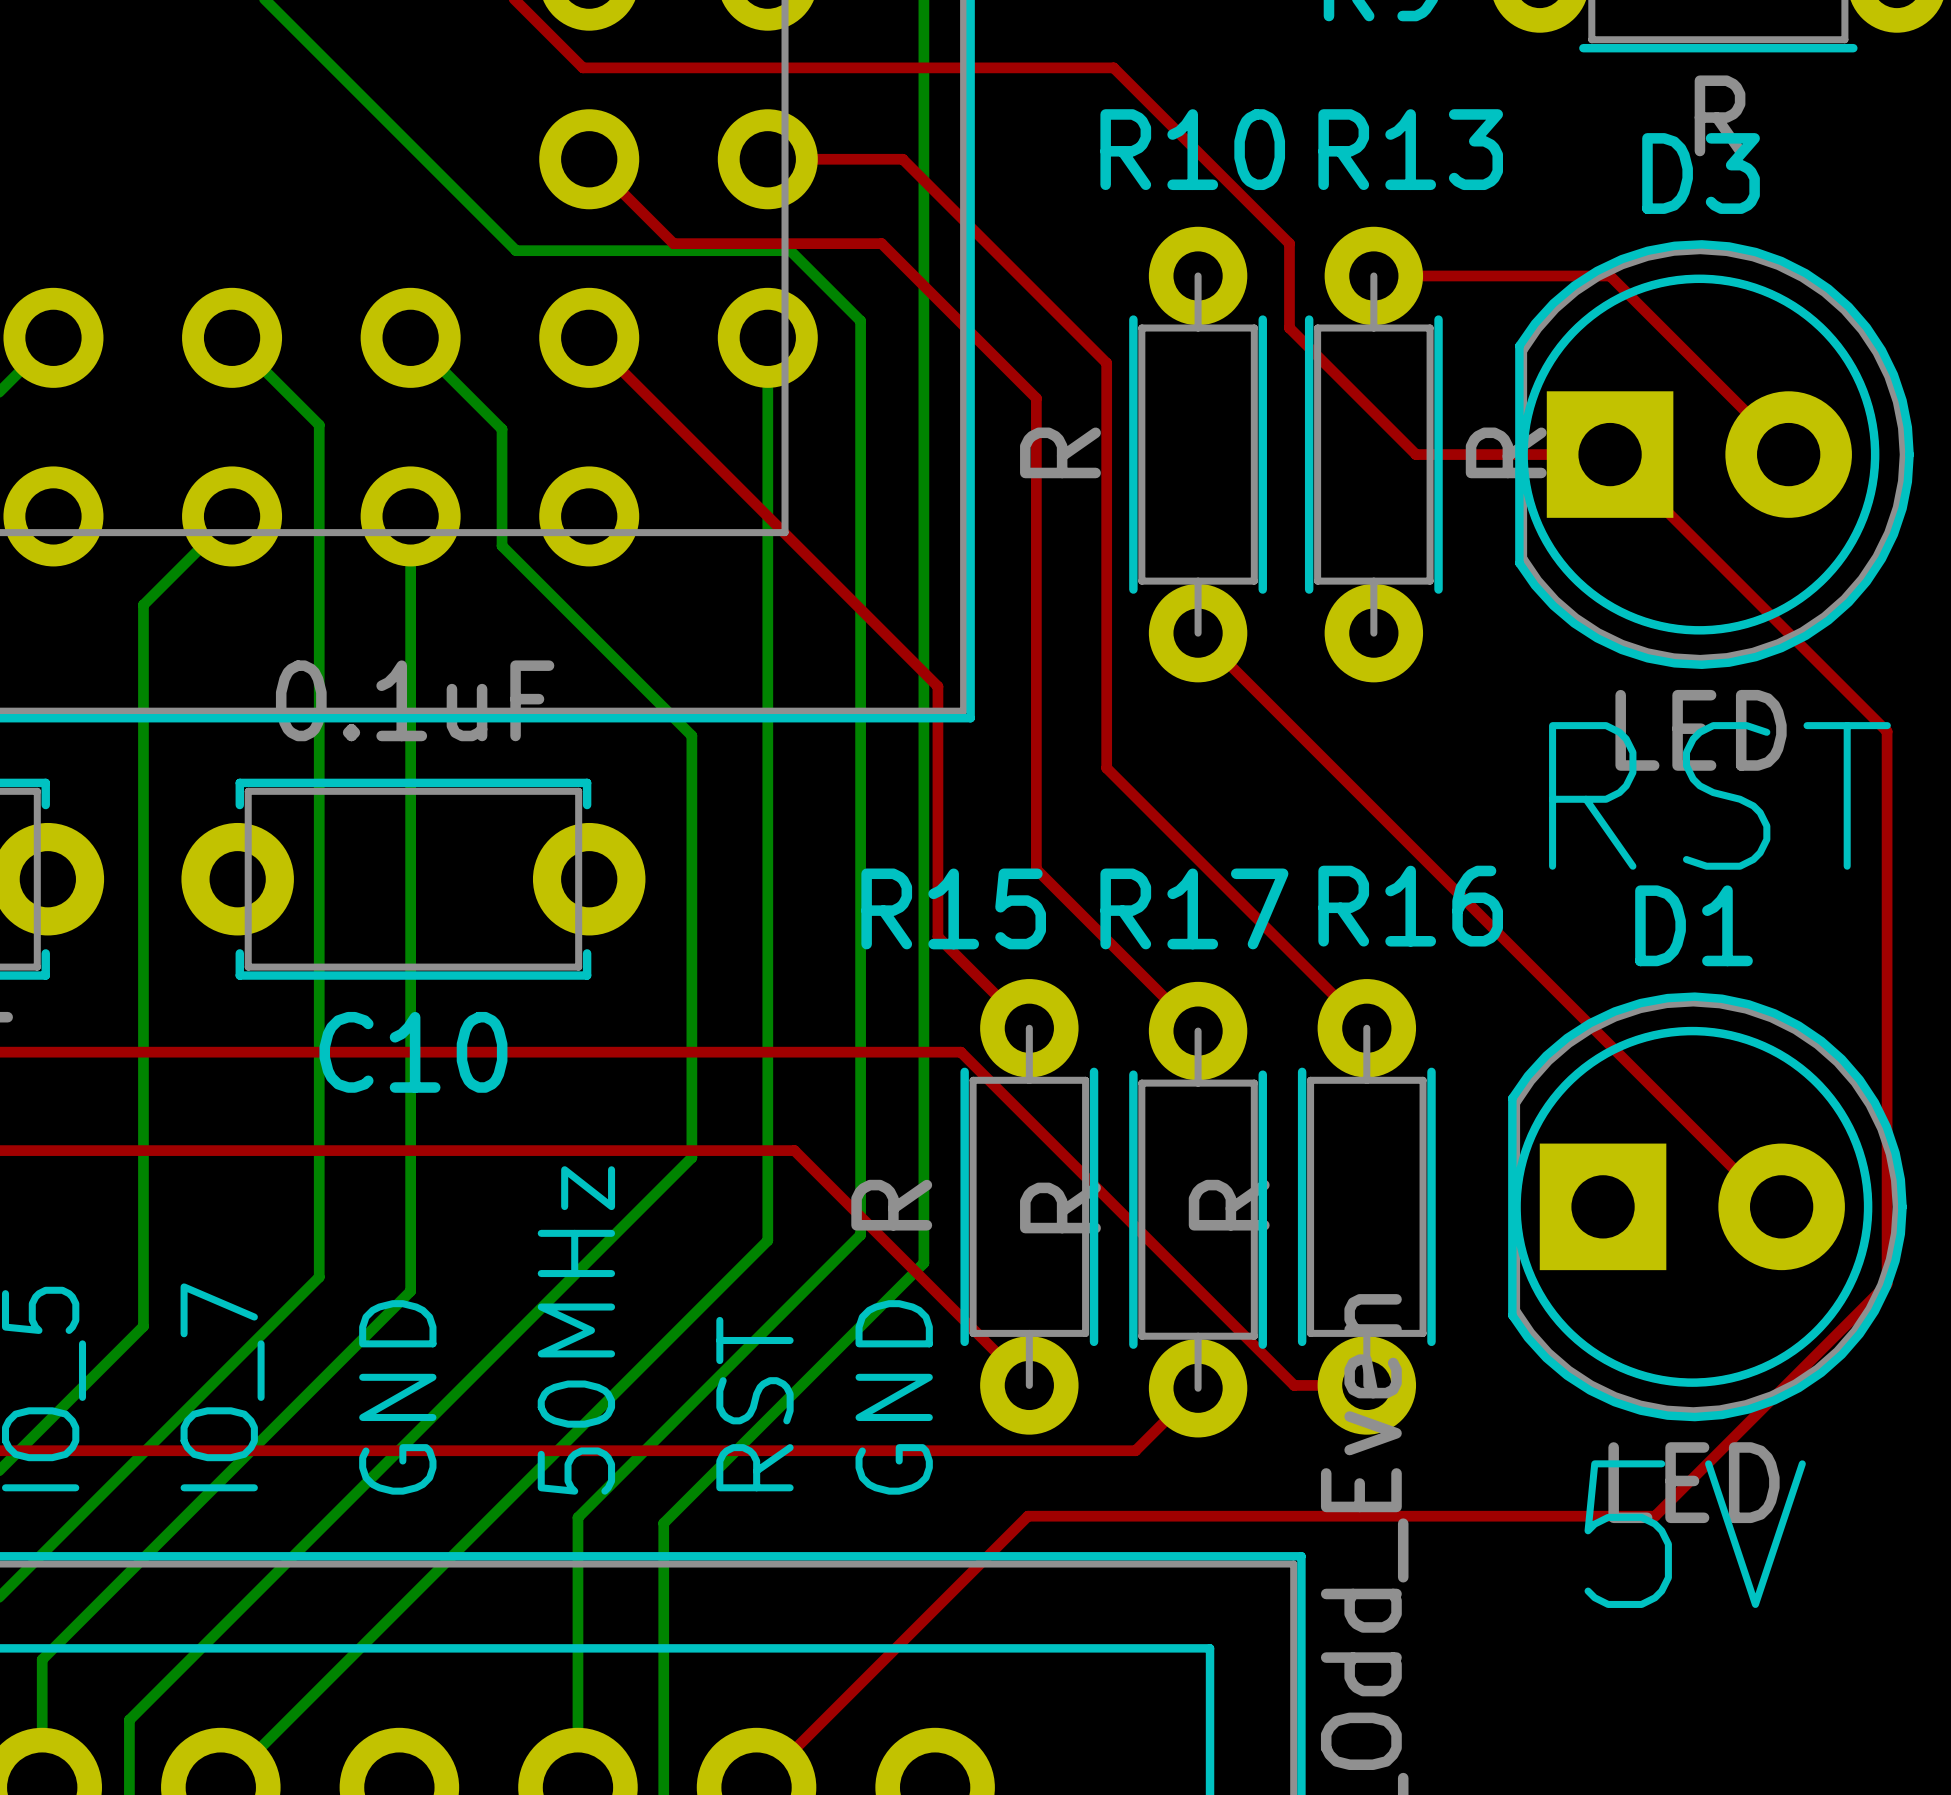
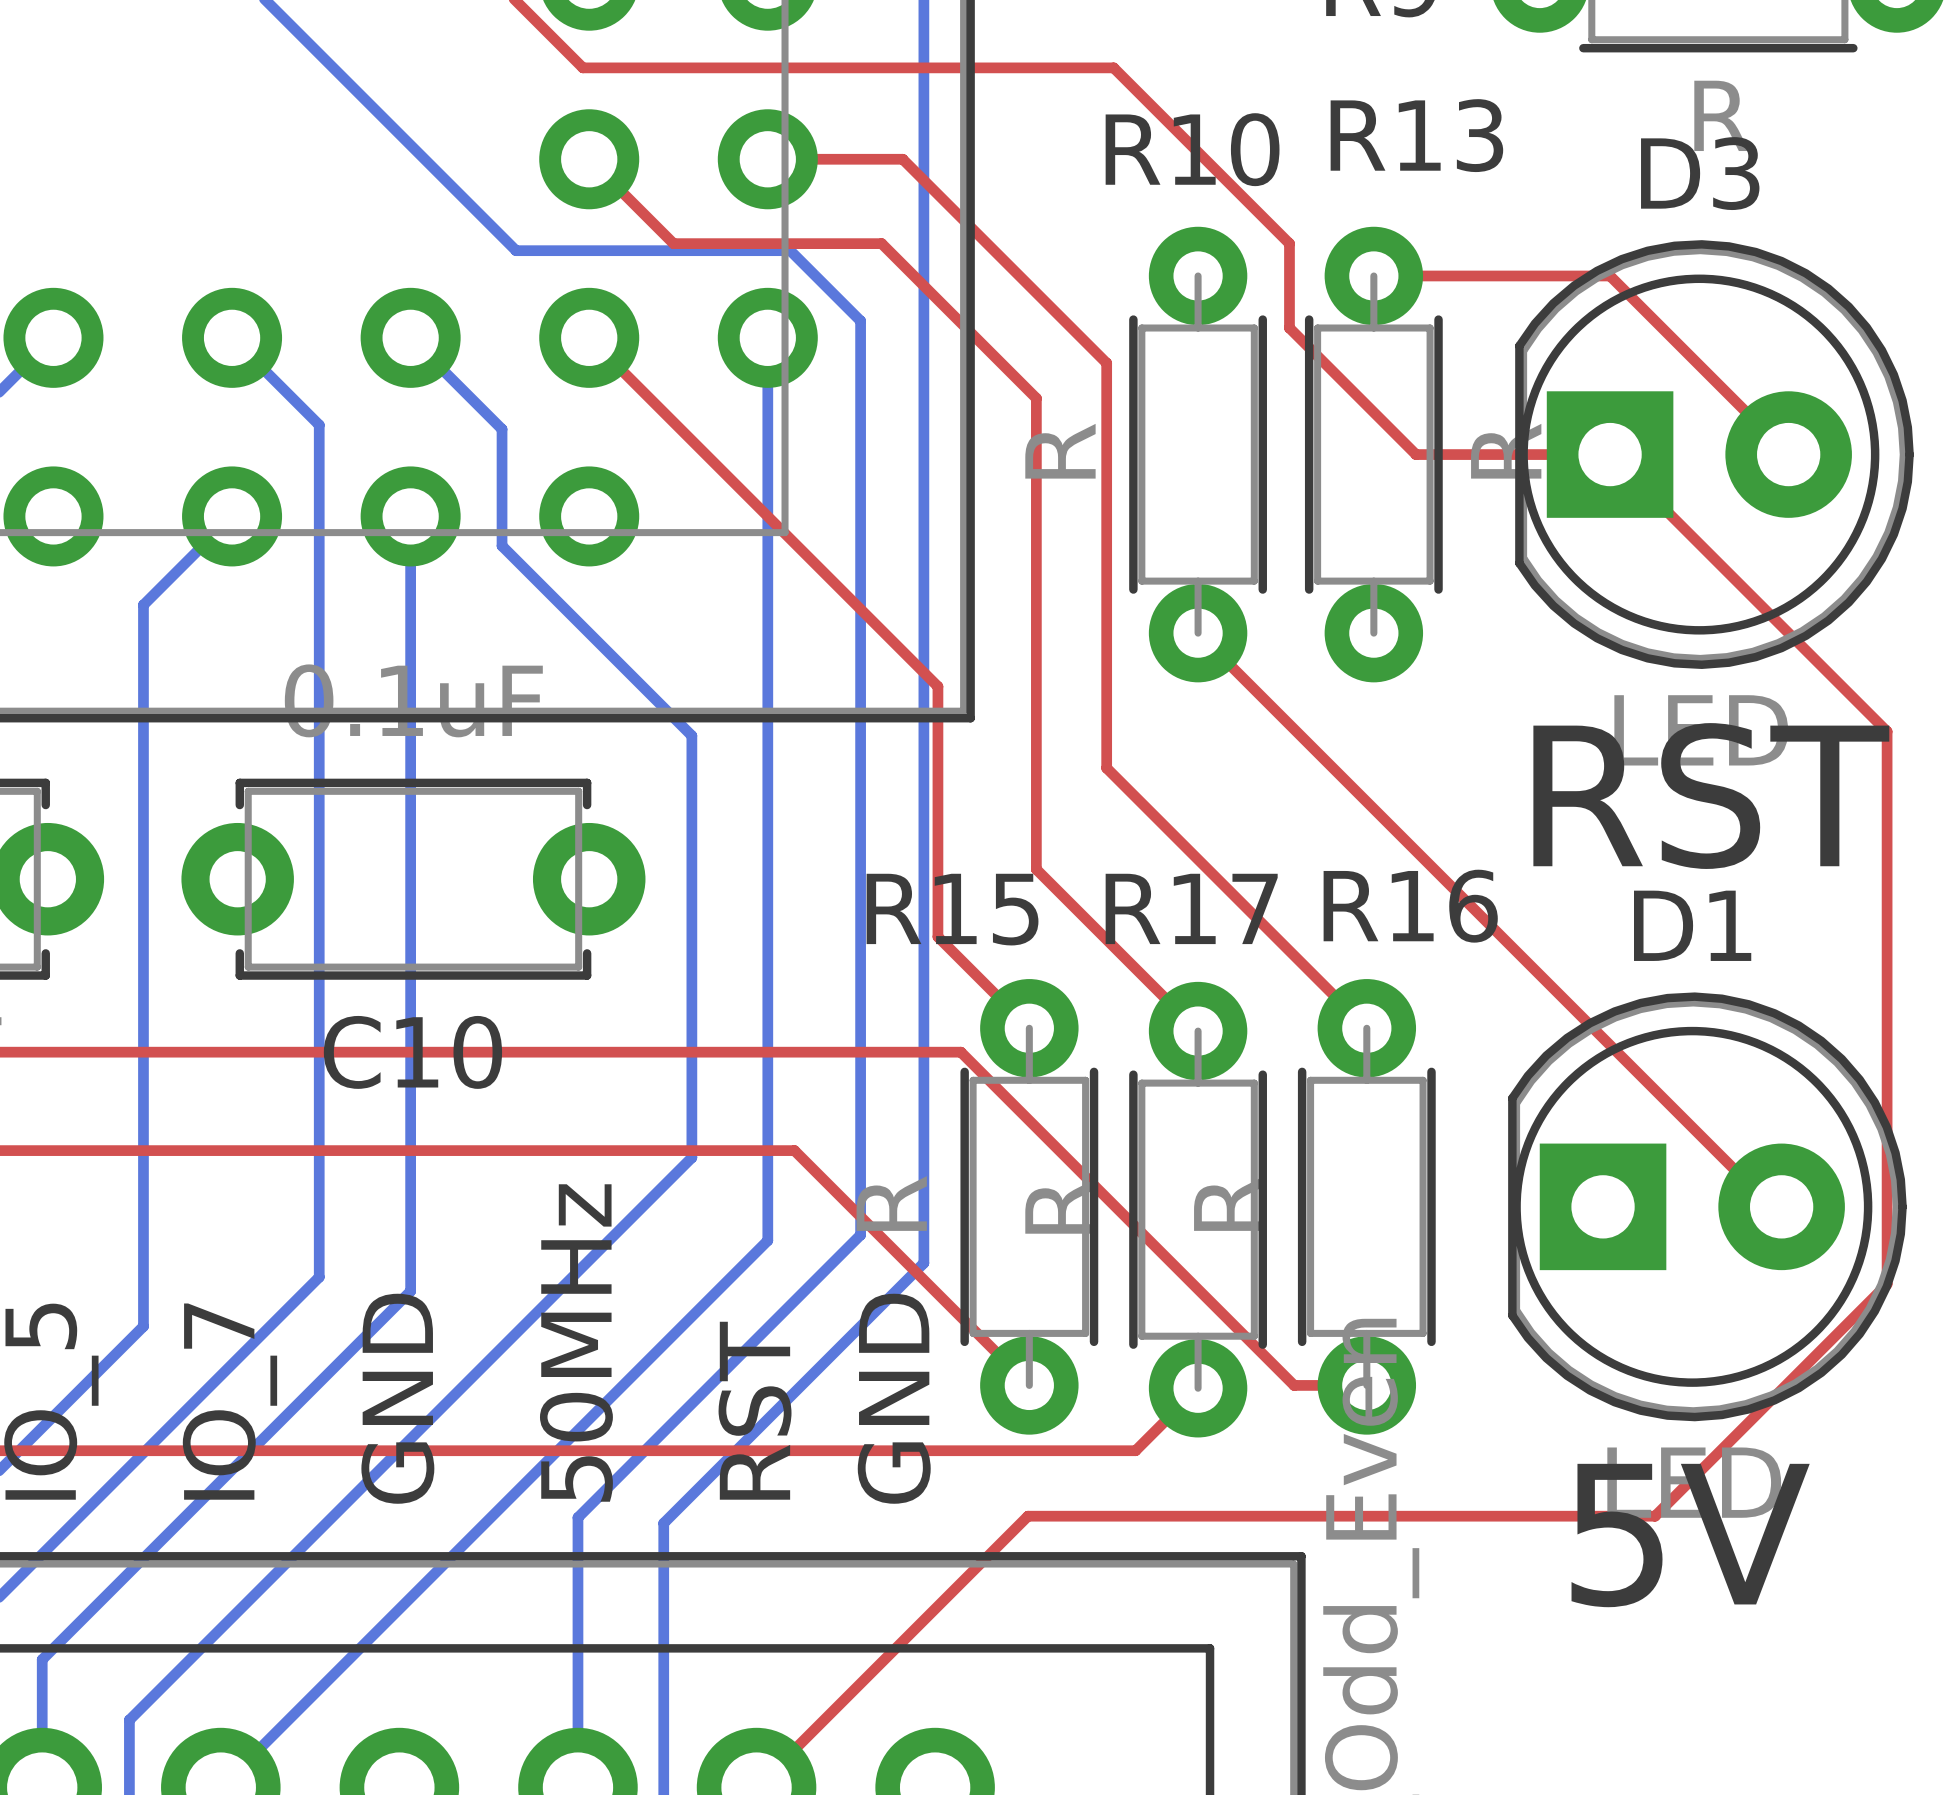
R13 name position: R13 (1410, 149) -> R13 (1416, 135)

